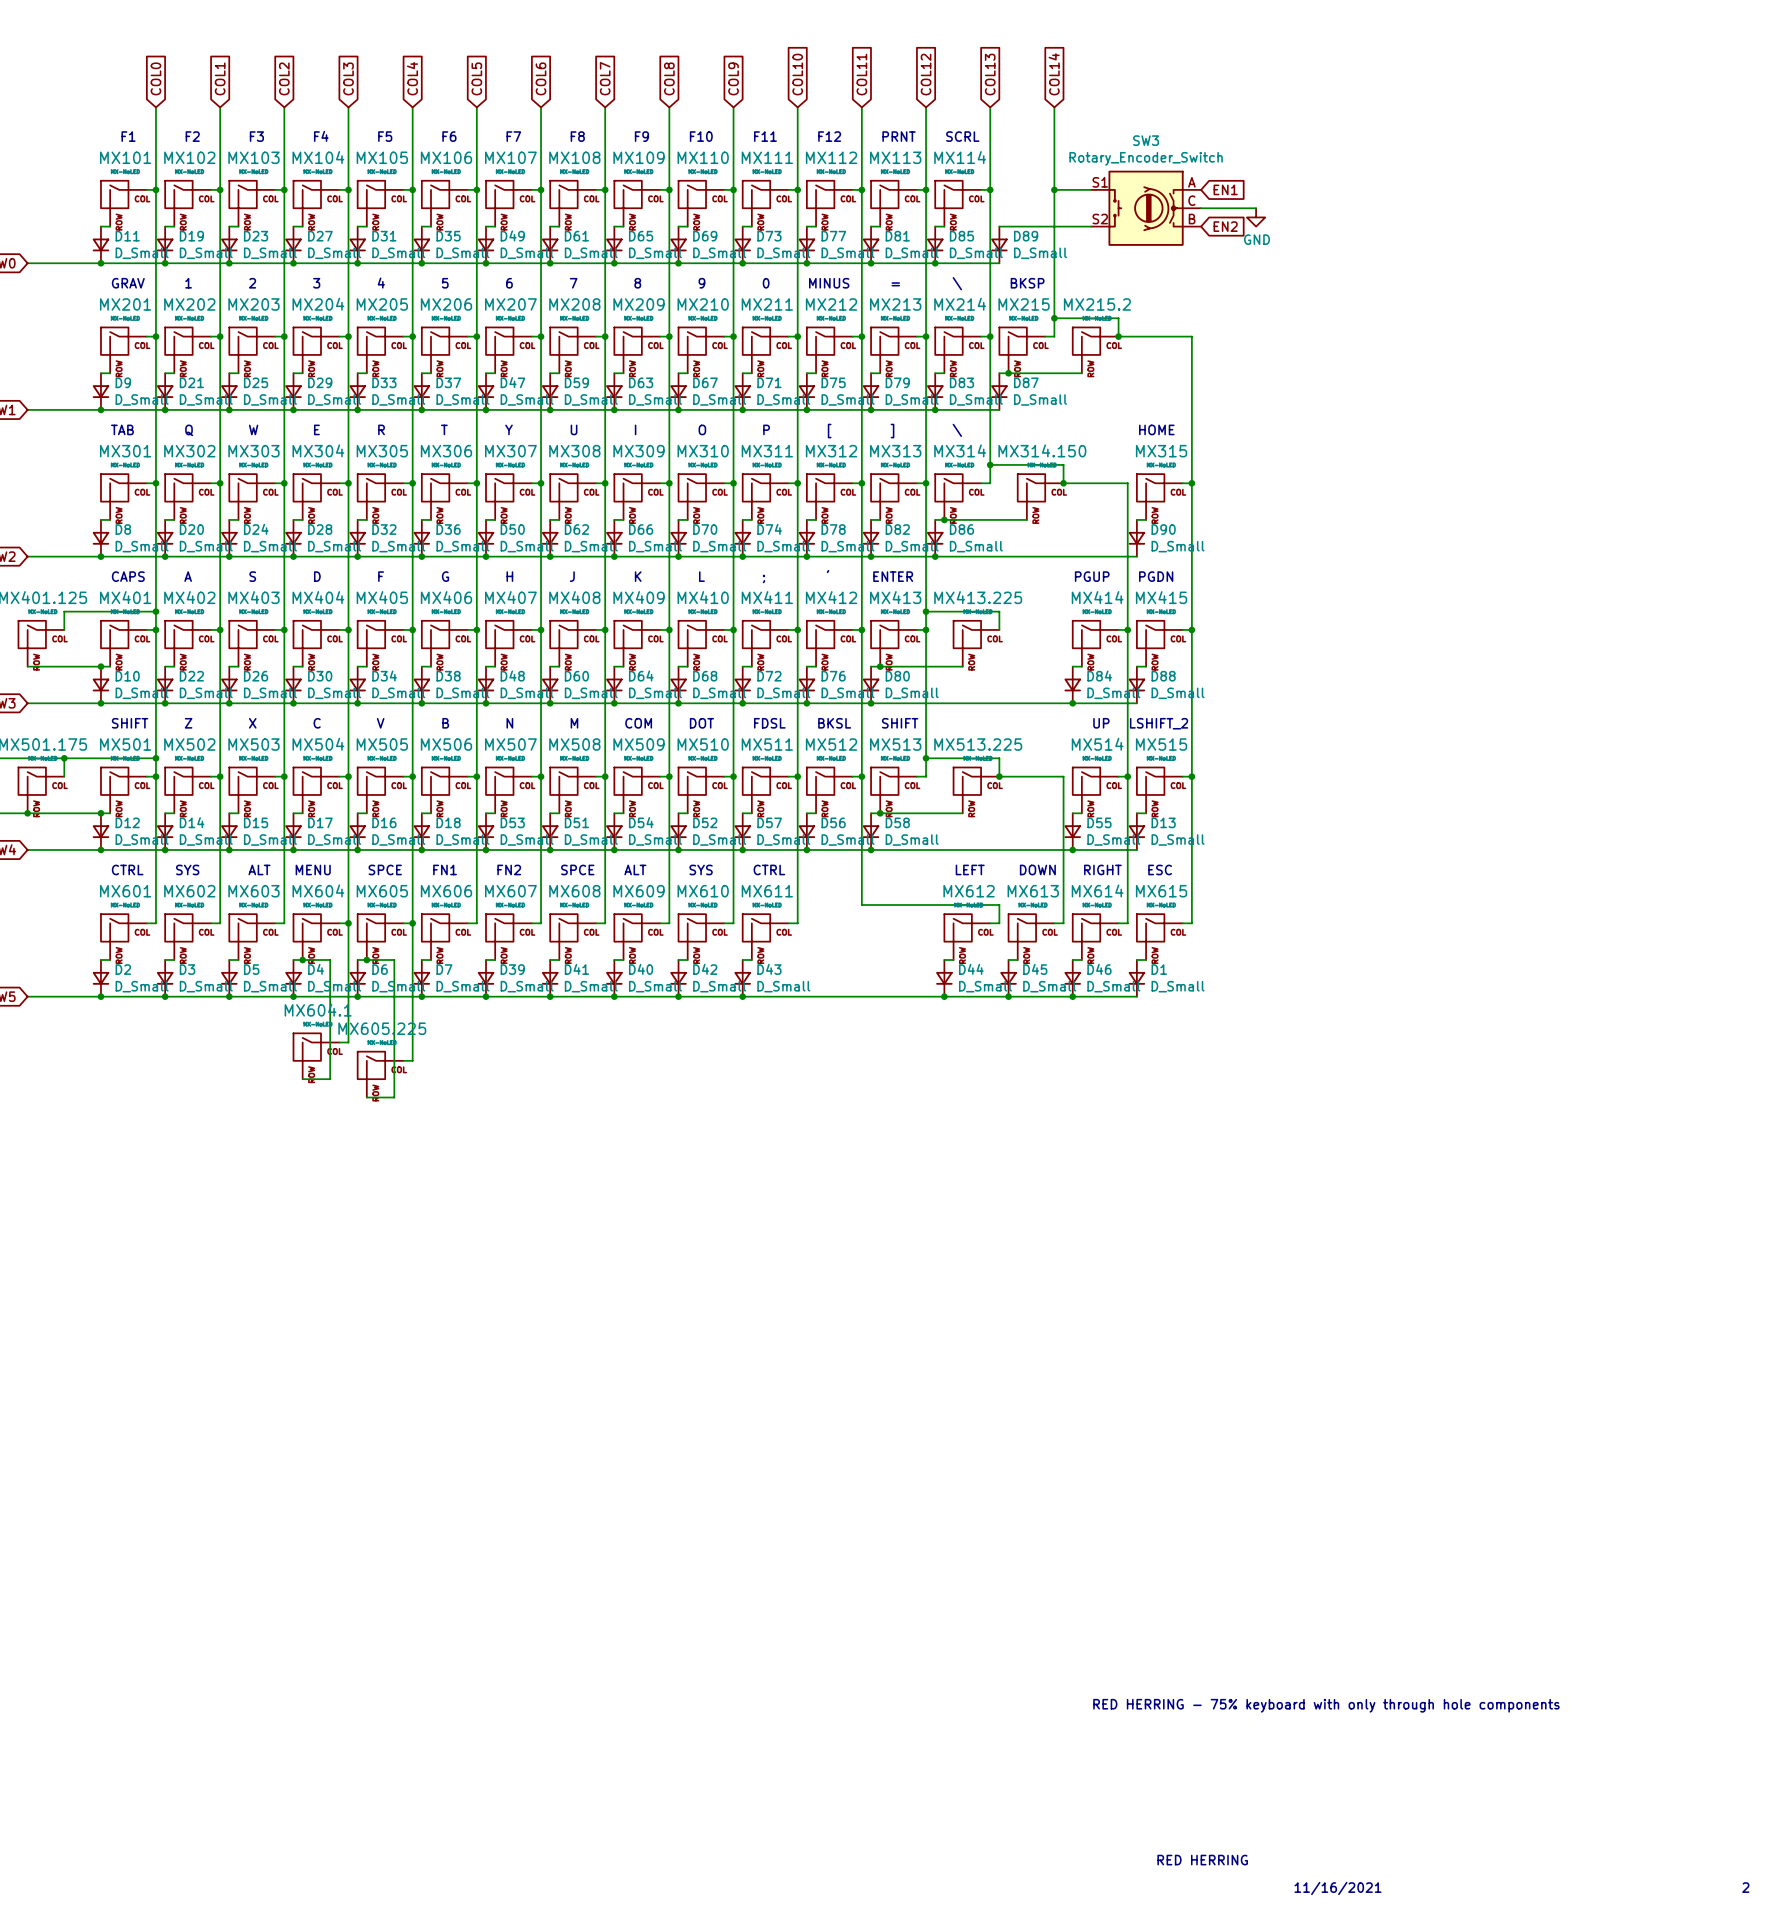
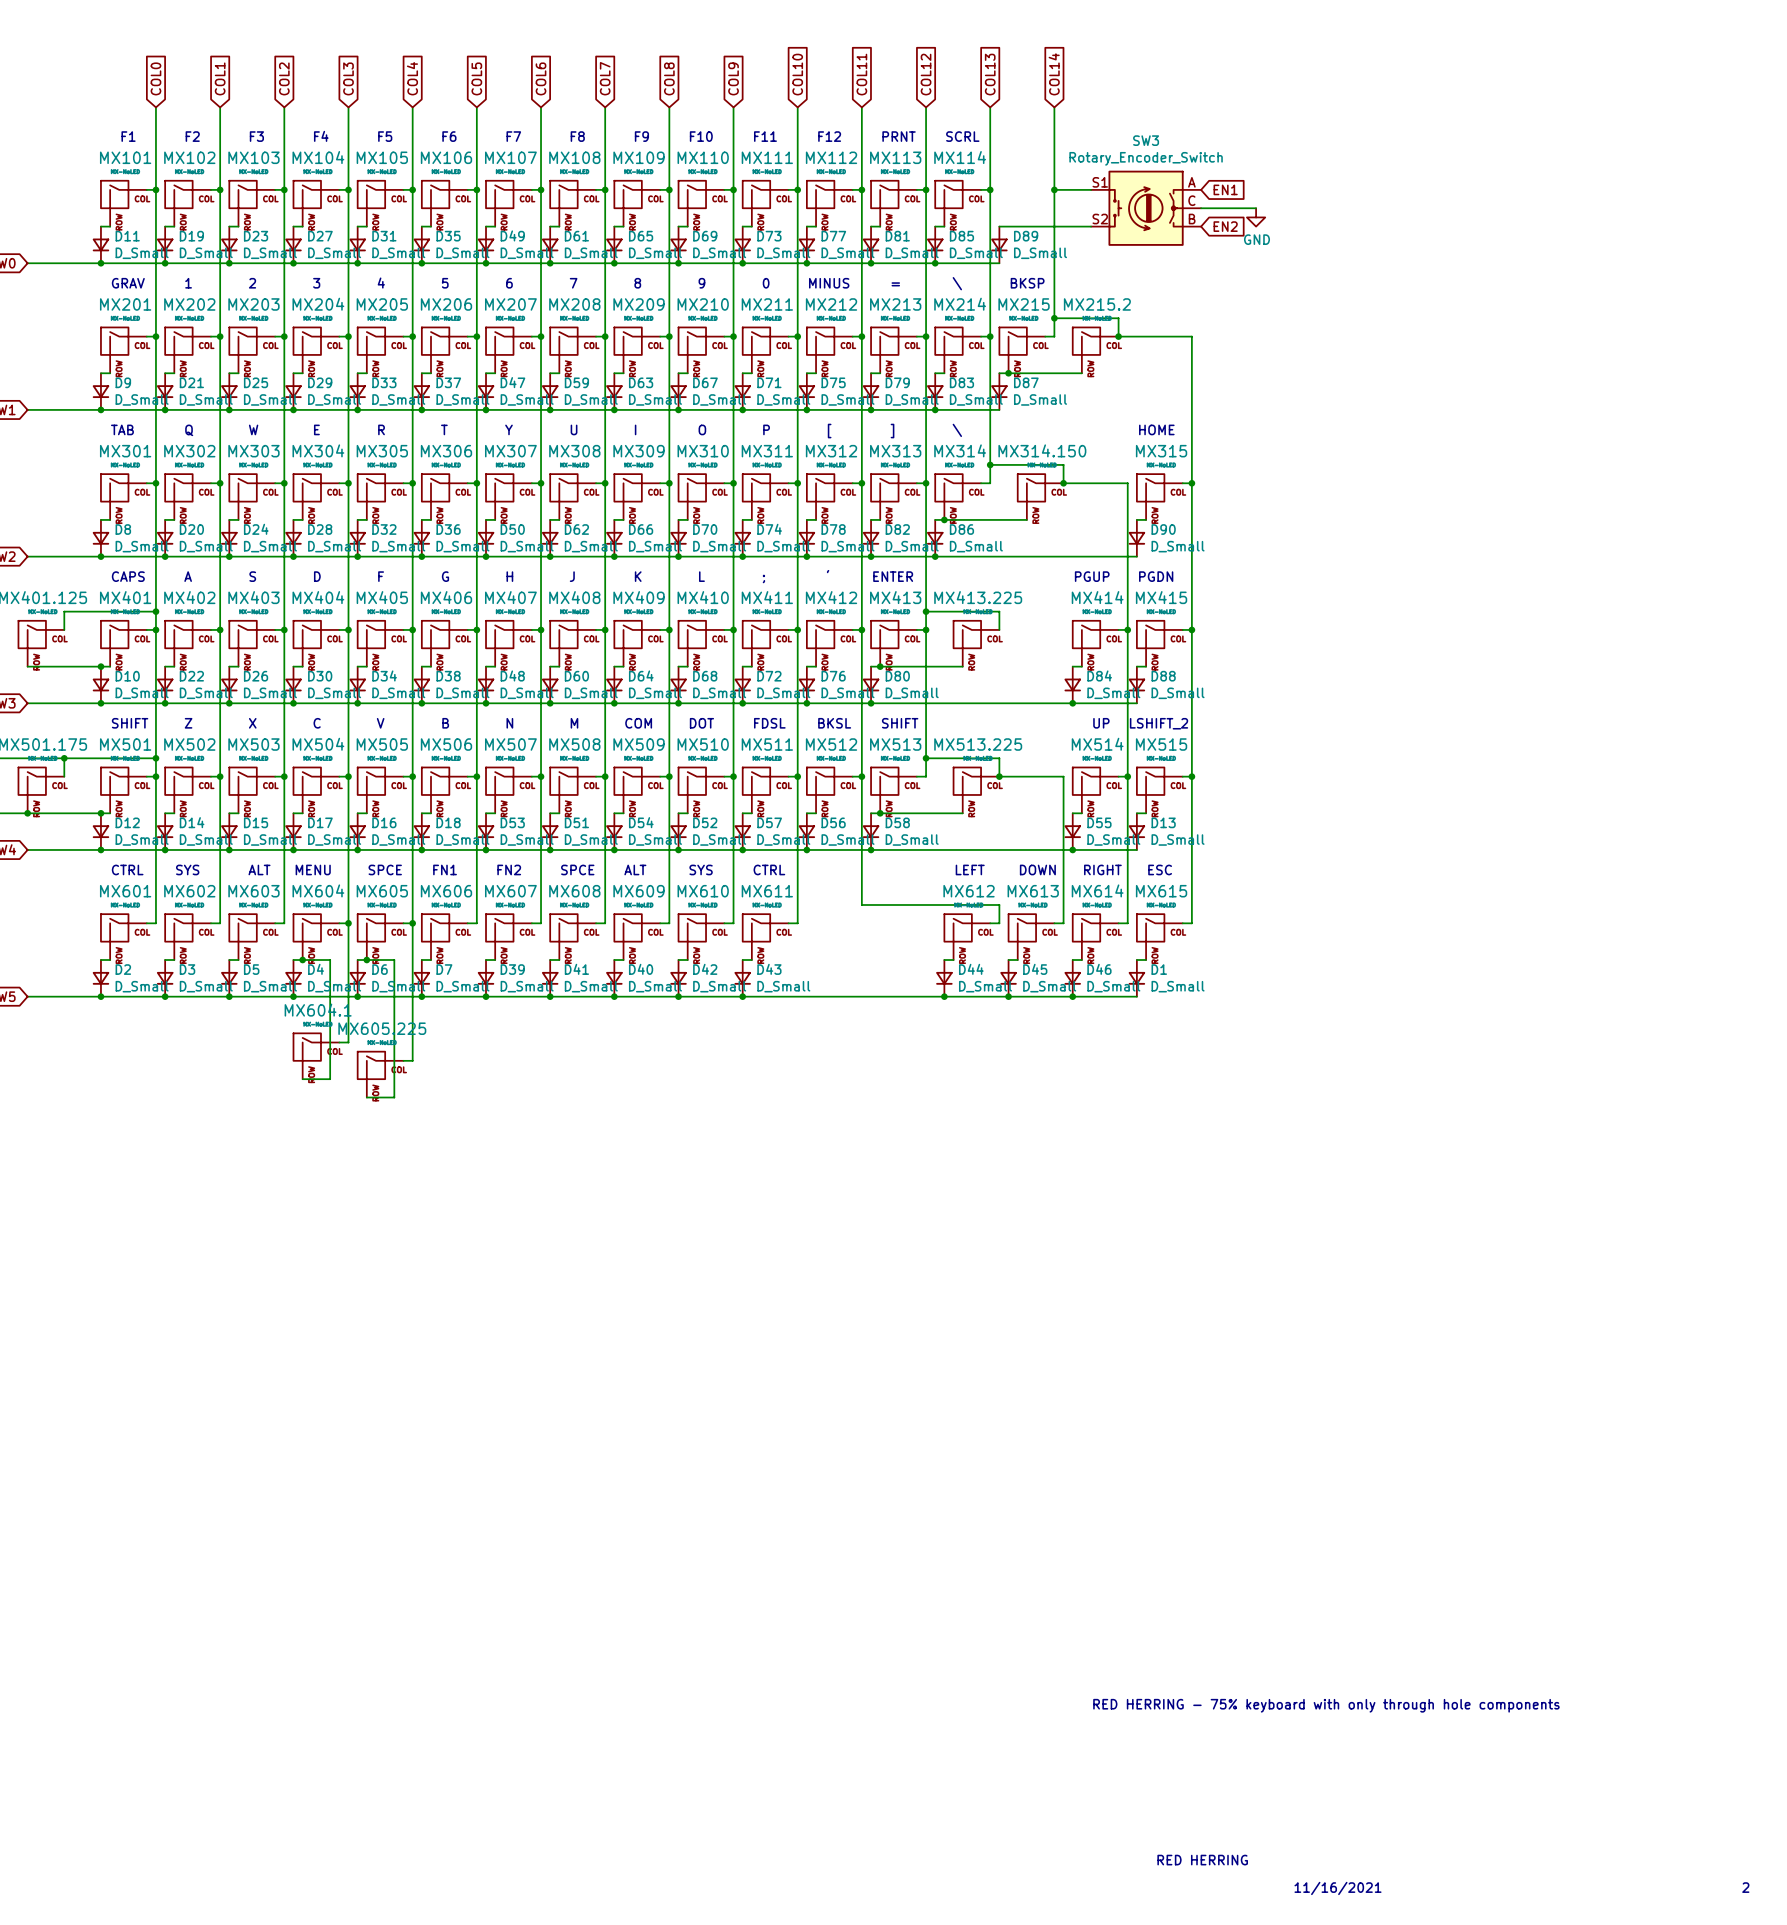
SW3 symbol: [1091, 170, 1202, 246] -> [1091, 170, 1202, 246]

